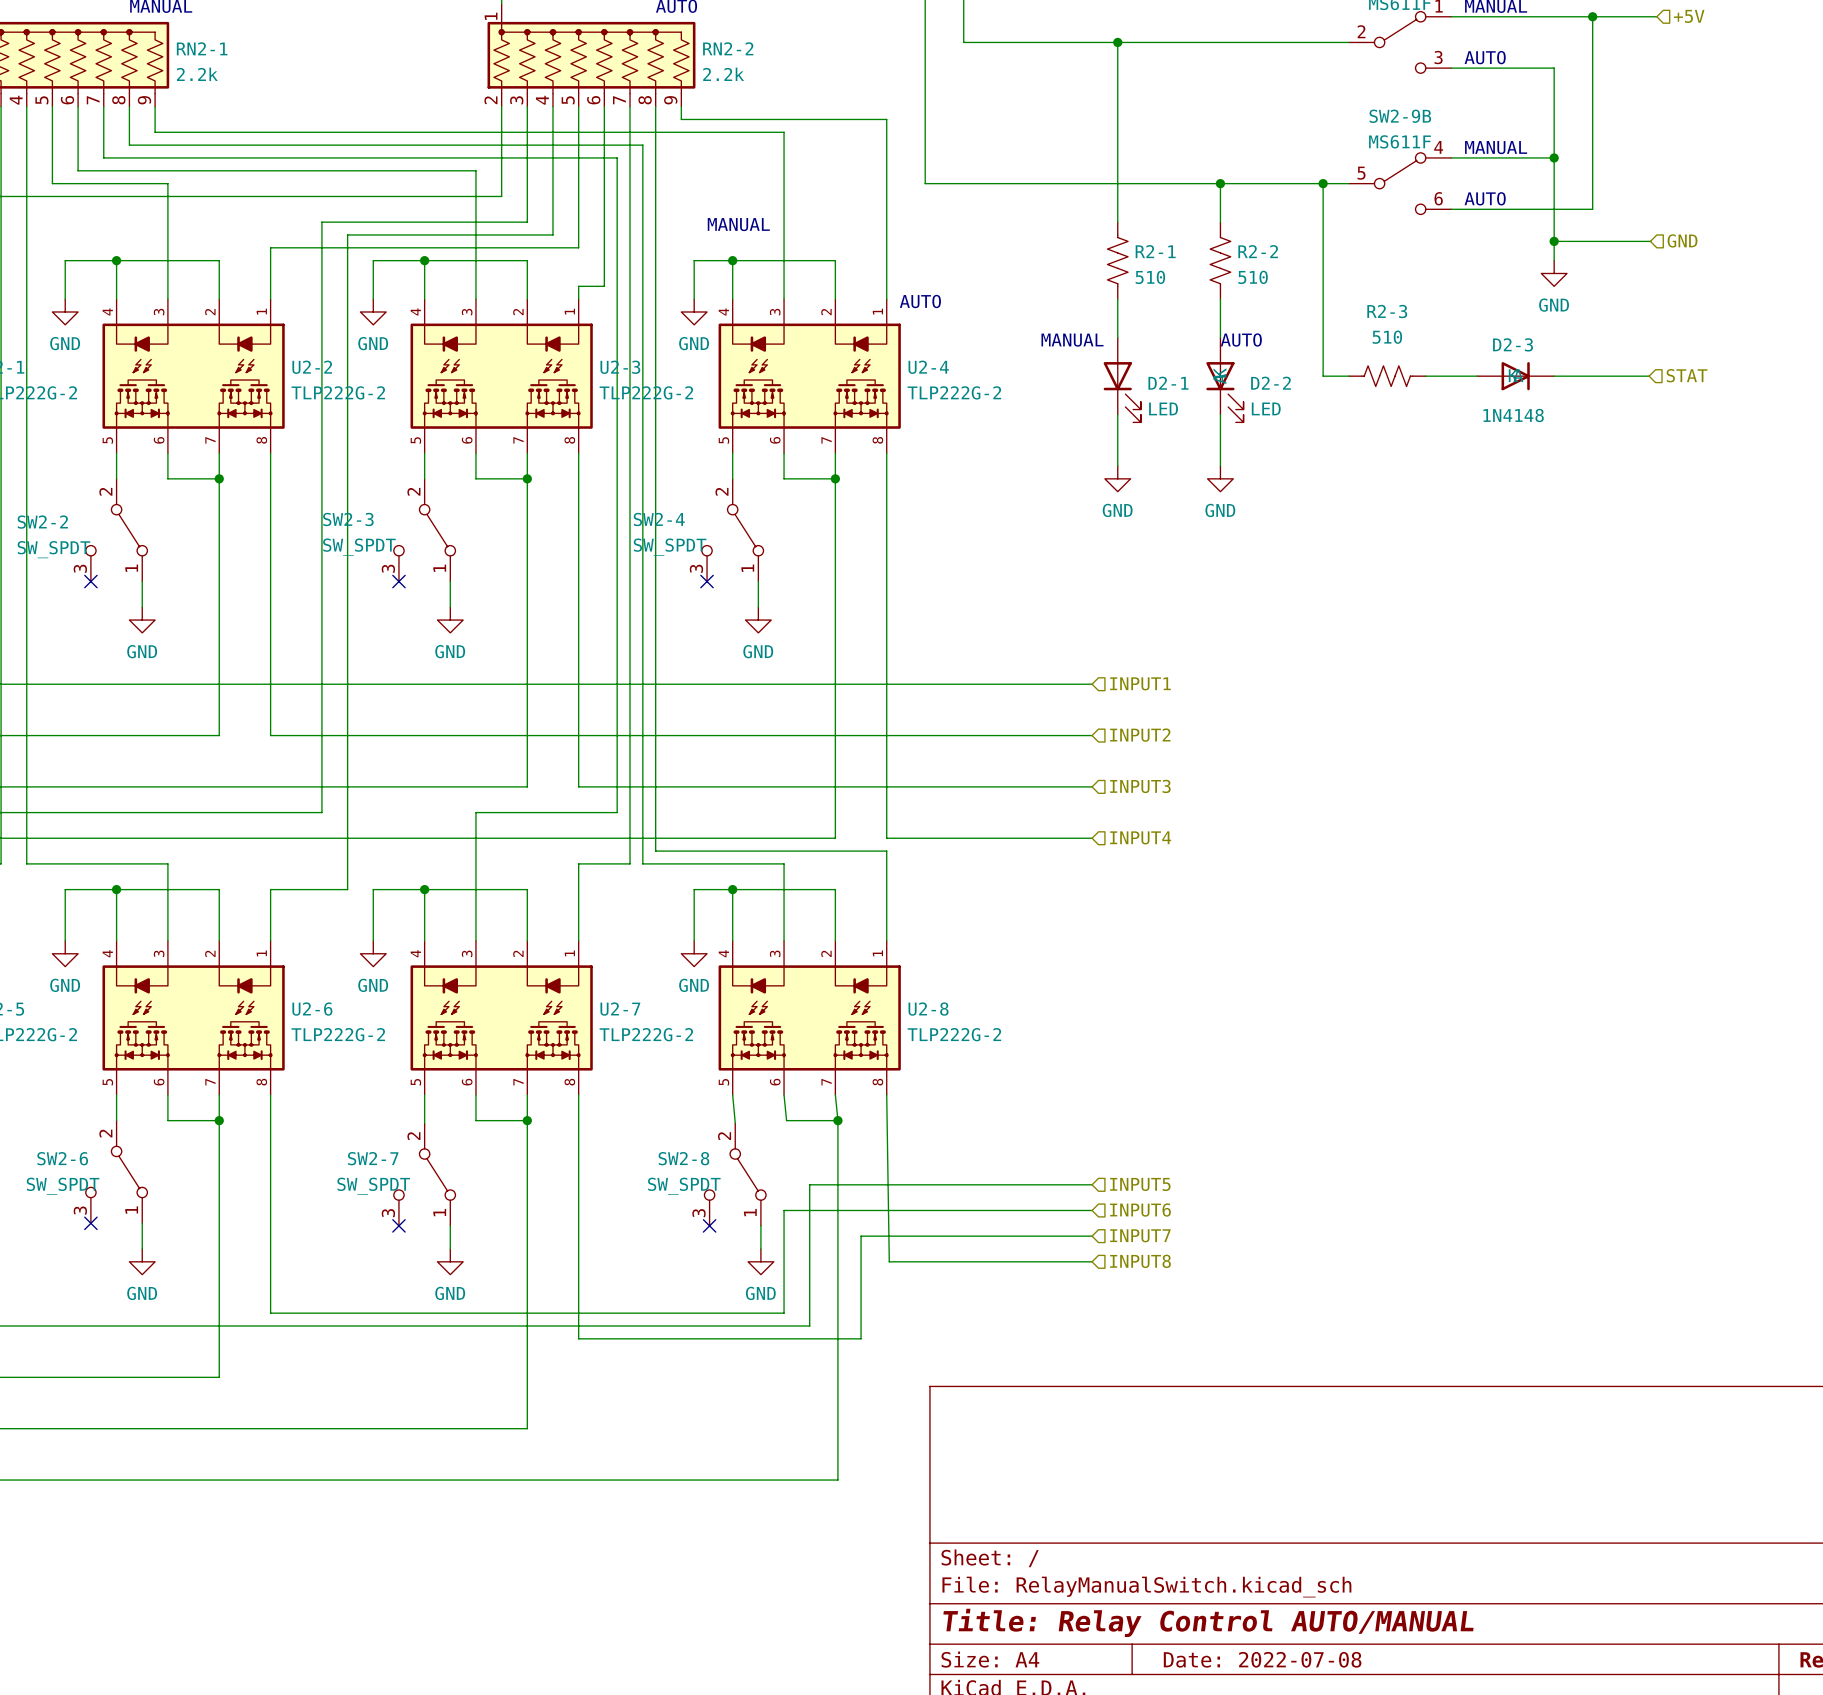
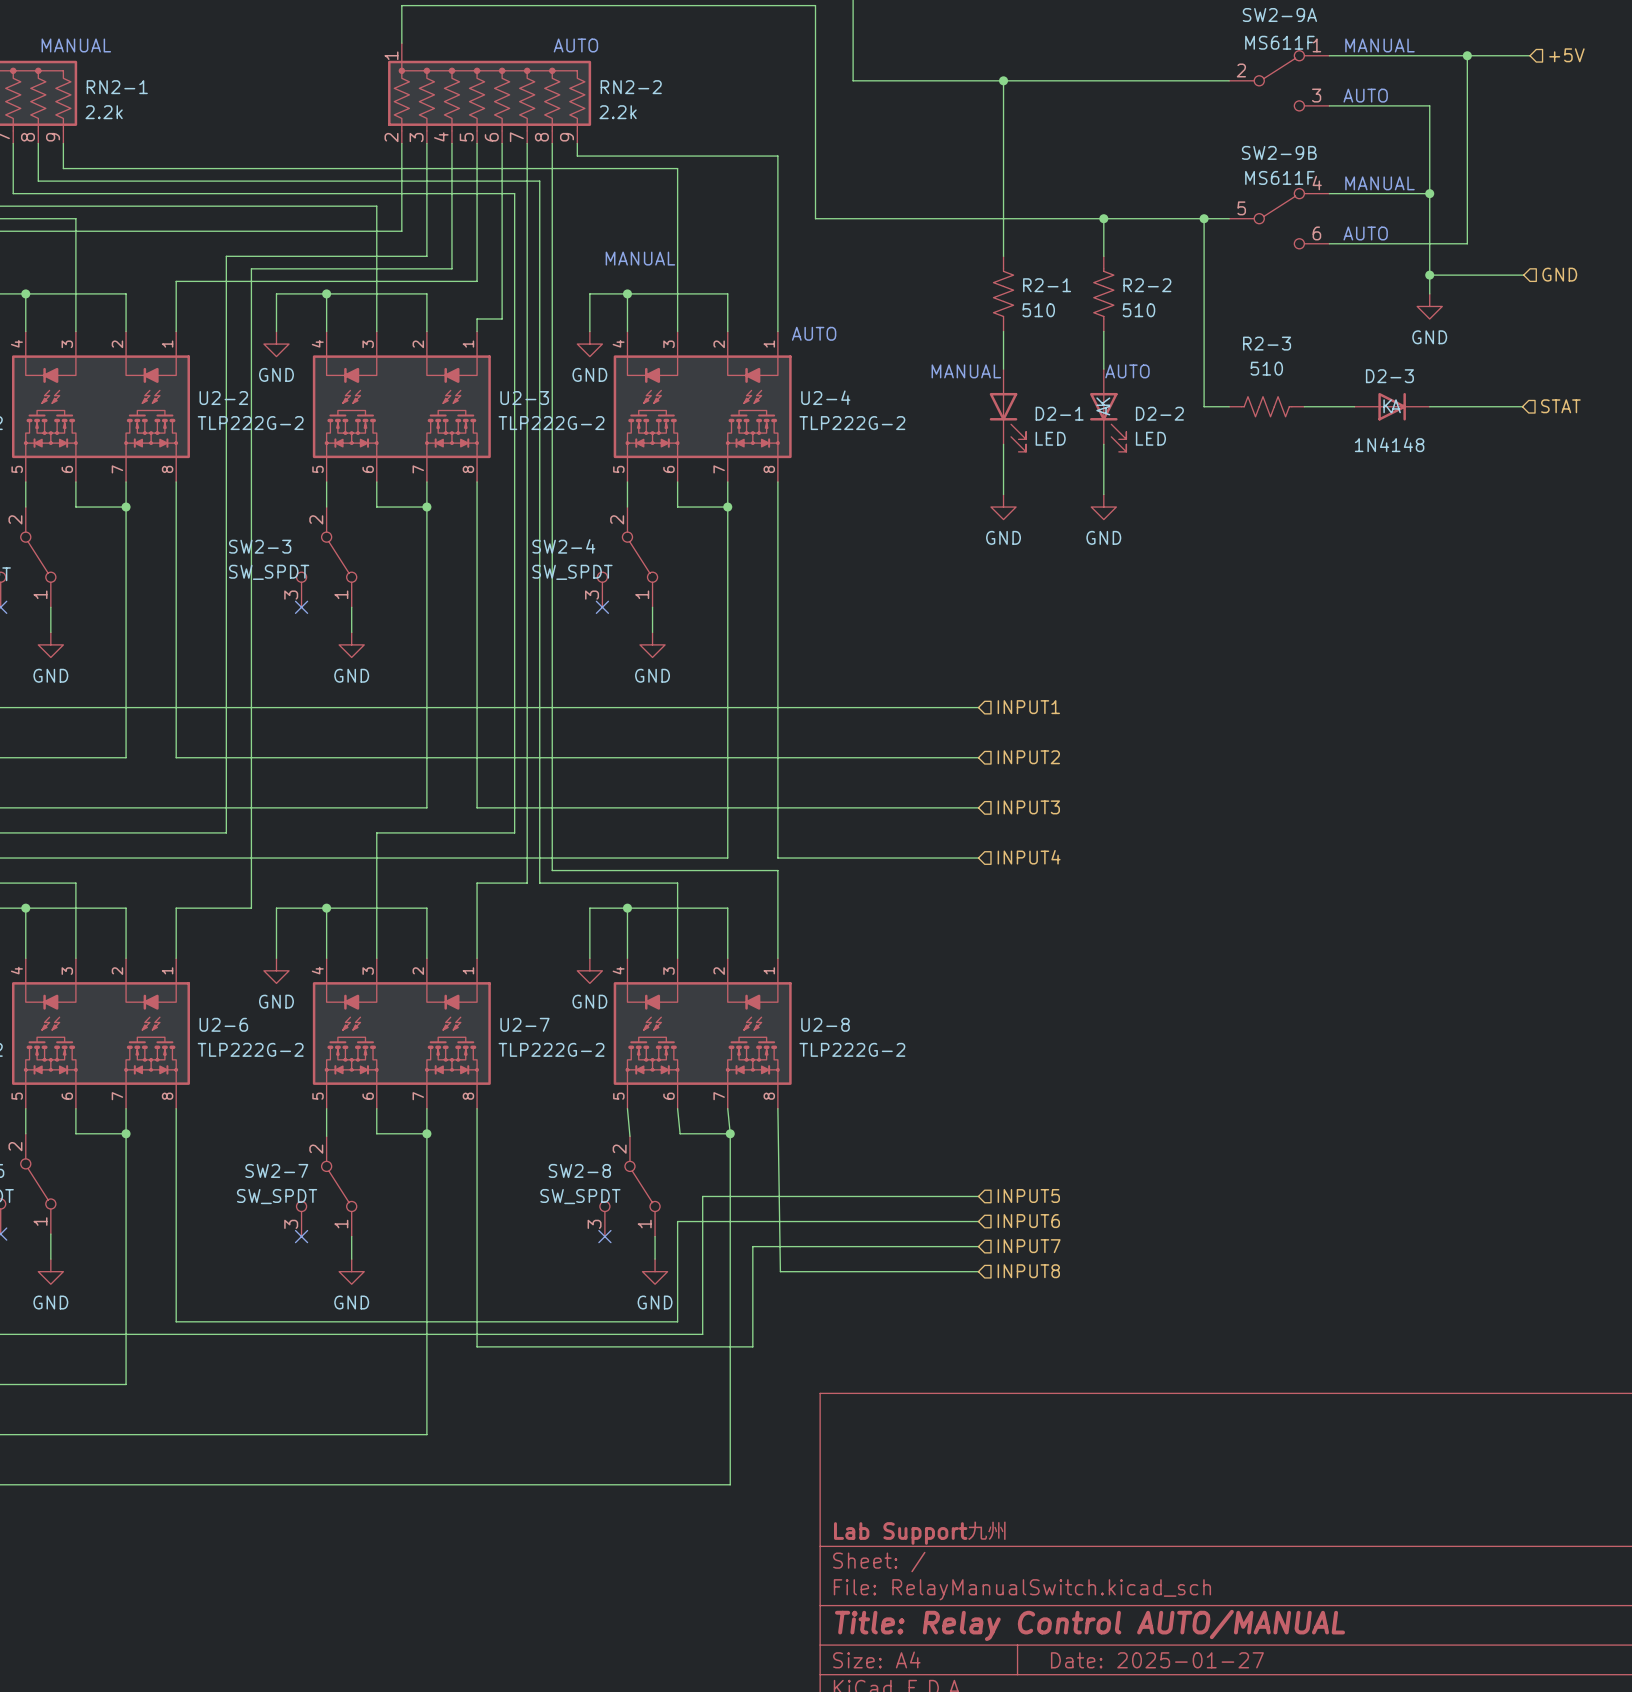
title block: none -> Lab Support九州 (920, 1532)
title block: Date: 2022-07-08 (1262, 1659) -> Date: 2025-01-27 (1157, 1660)

